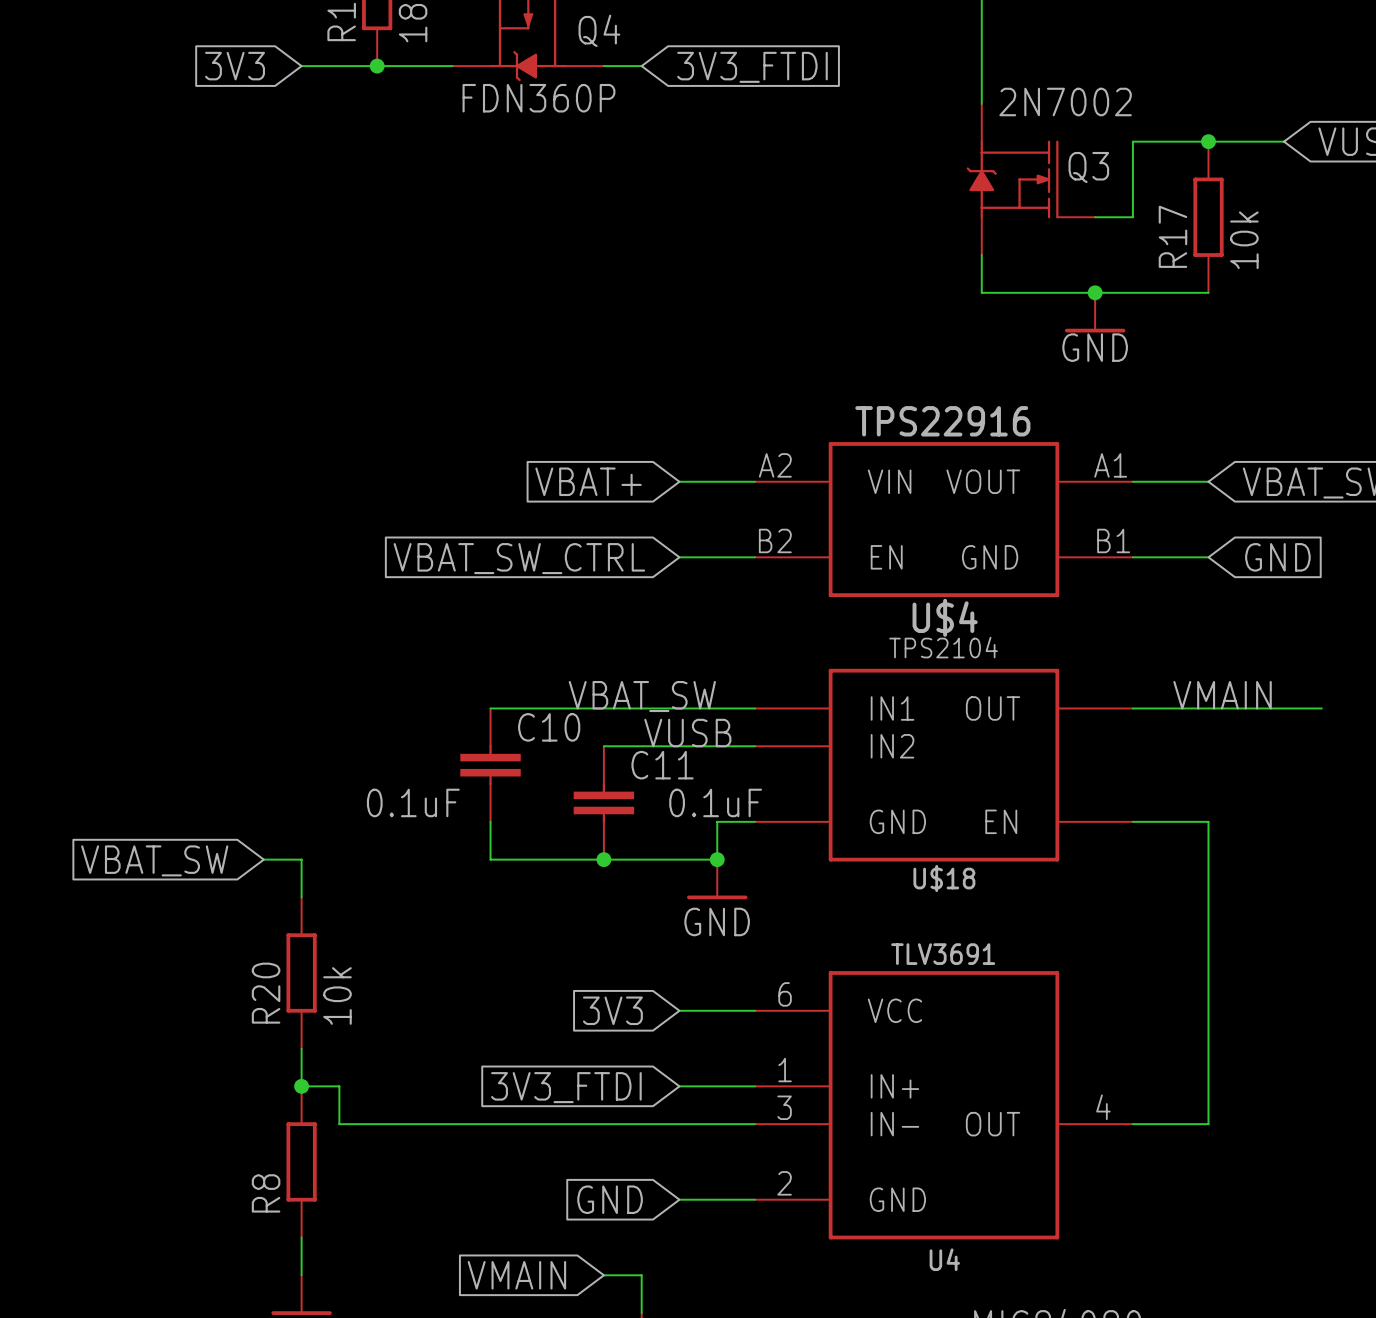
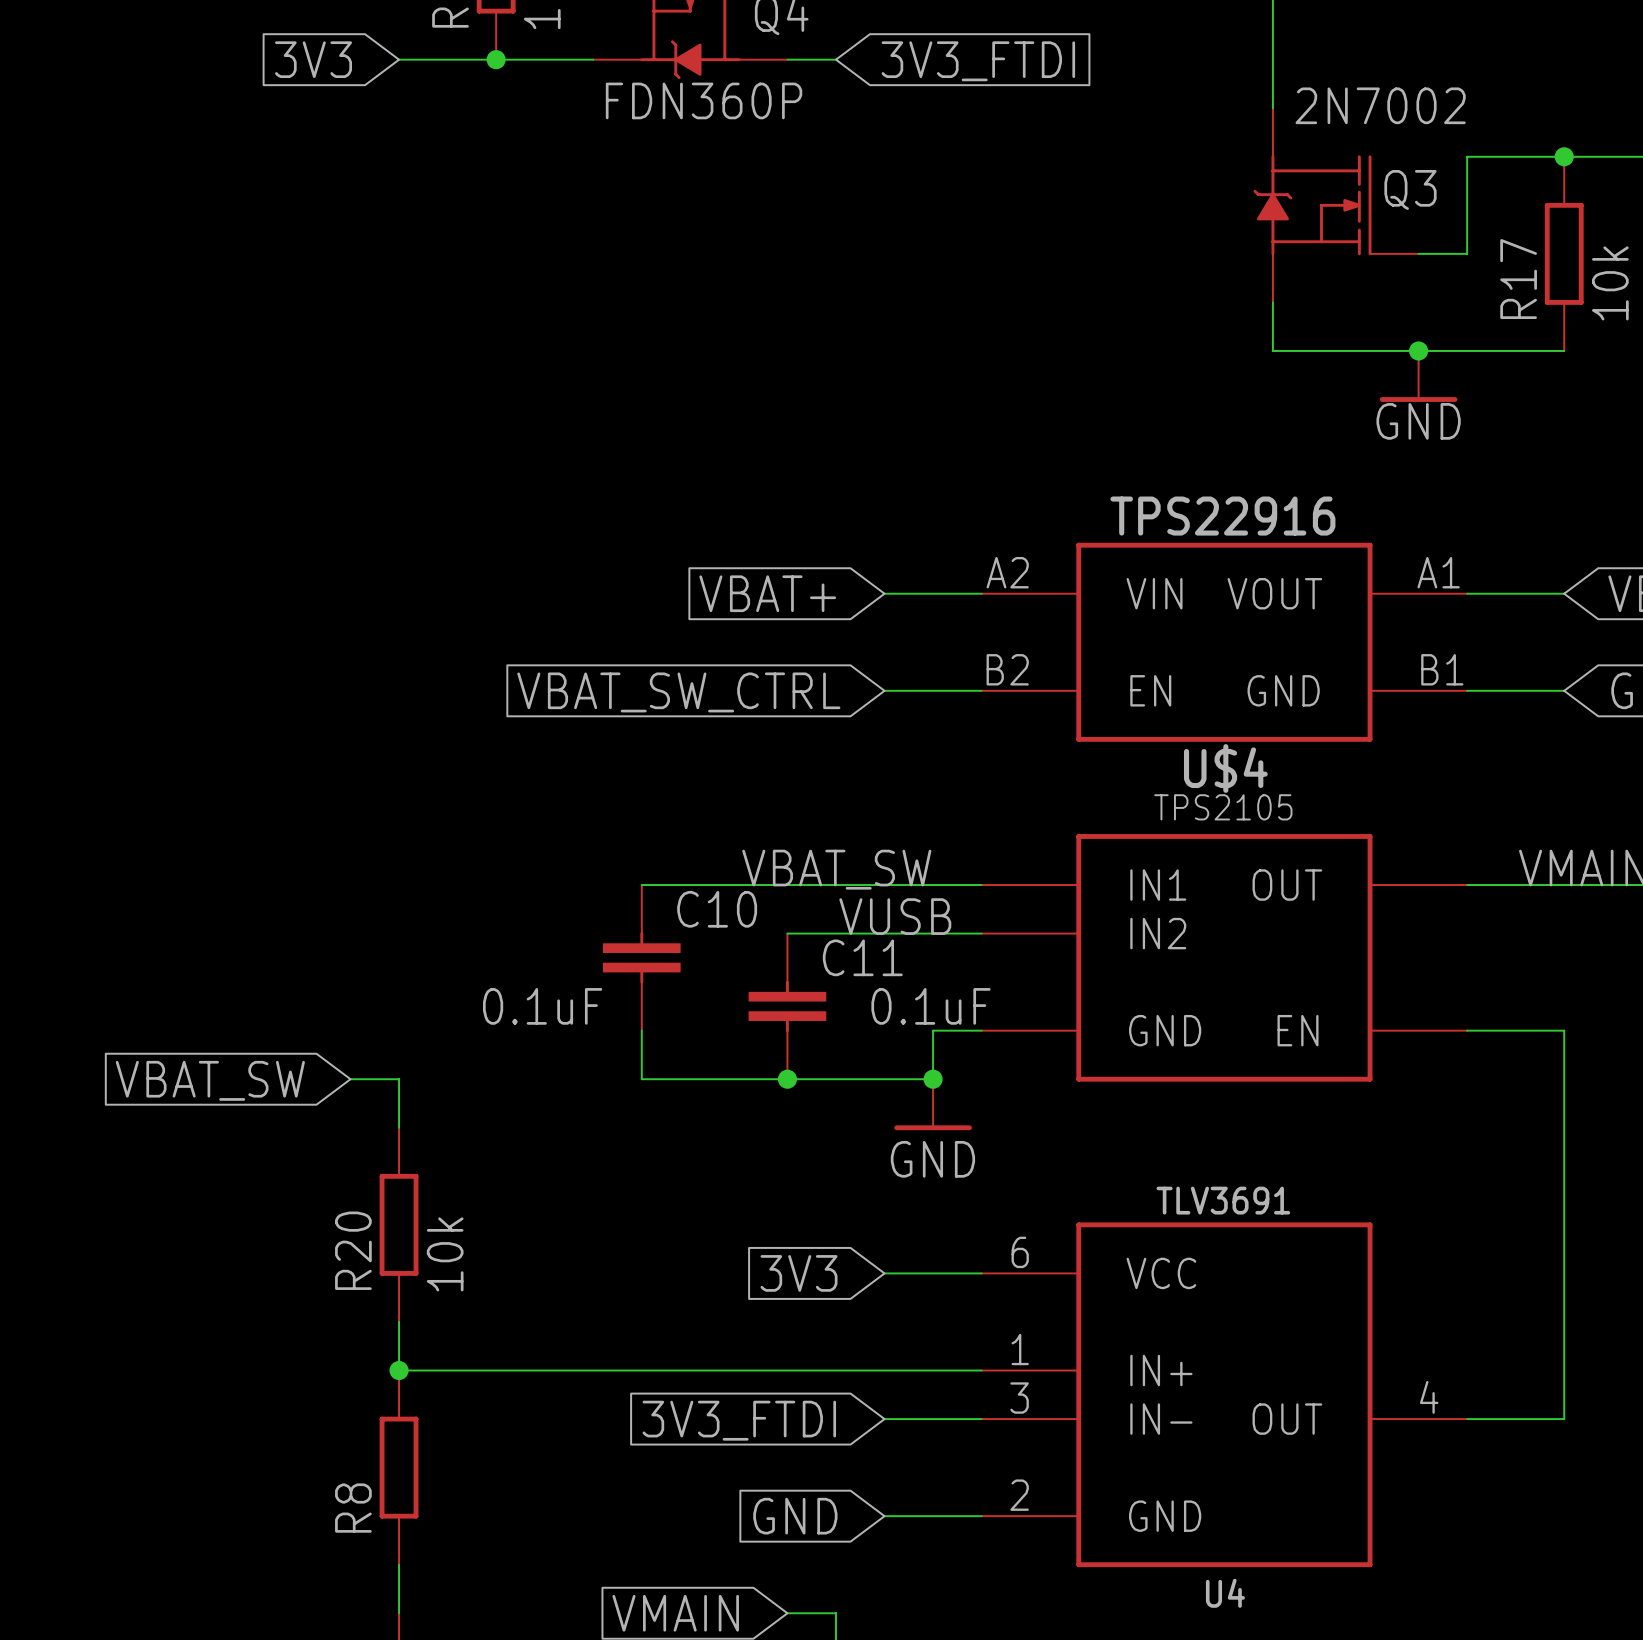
U$18 text: TPS2104 (943, 647) -> none
U$18 text: none -> TPS2105 (1223, 807)
U$18 name: U$18 (944, 878) -> none
wire: (339, 1086) (339, 1124) (679, 1124) -> (447, 1370) (884, 1370)
global label position: 3V3_FTDI (566, 1087) -> 3V3_FTDI (739, 1420)

